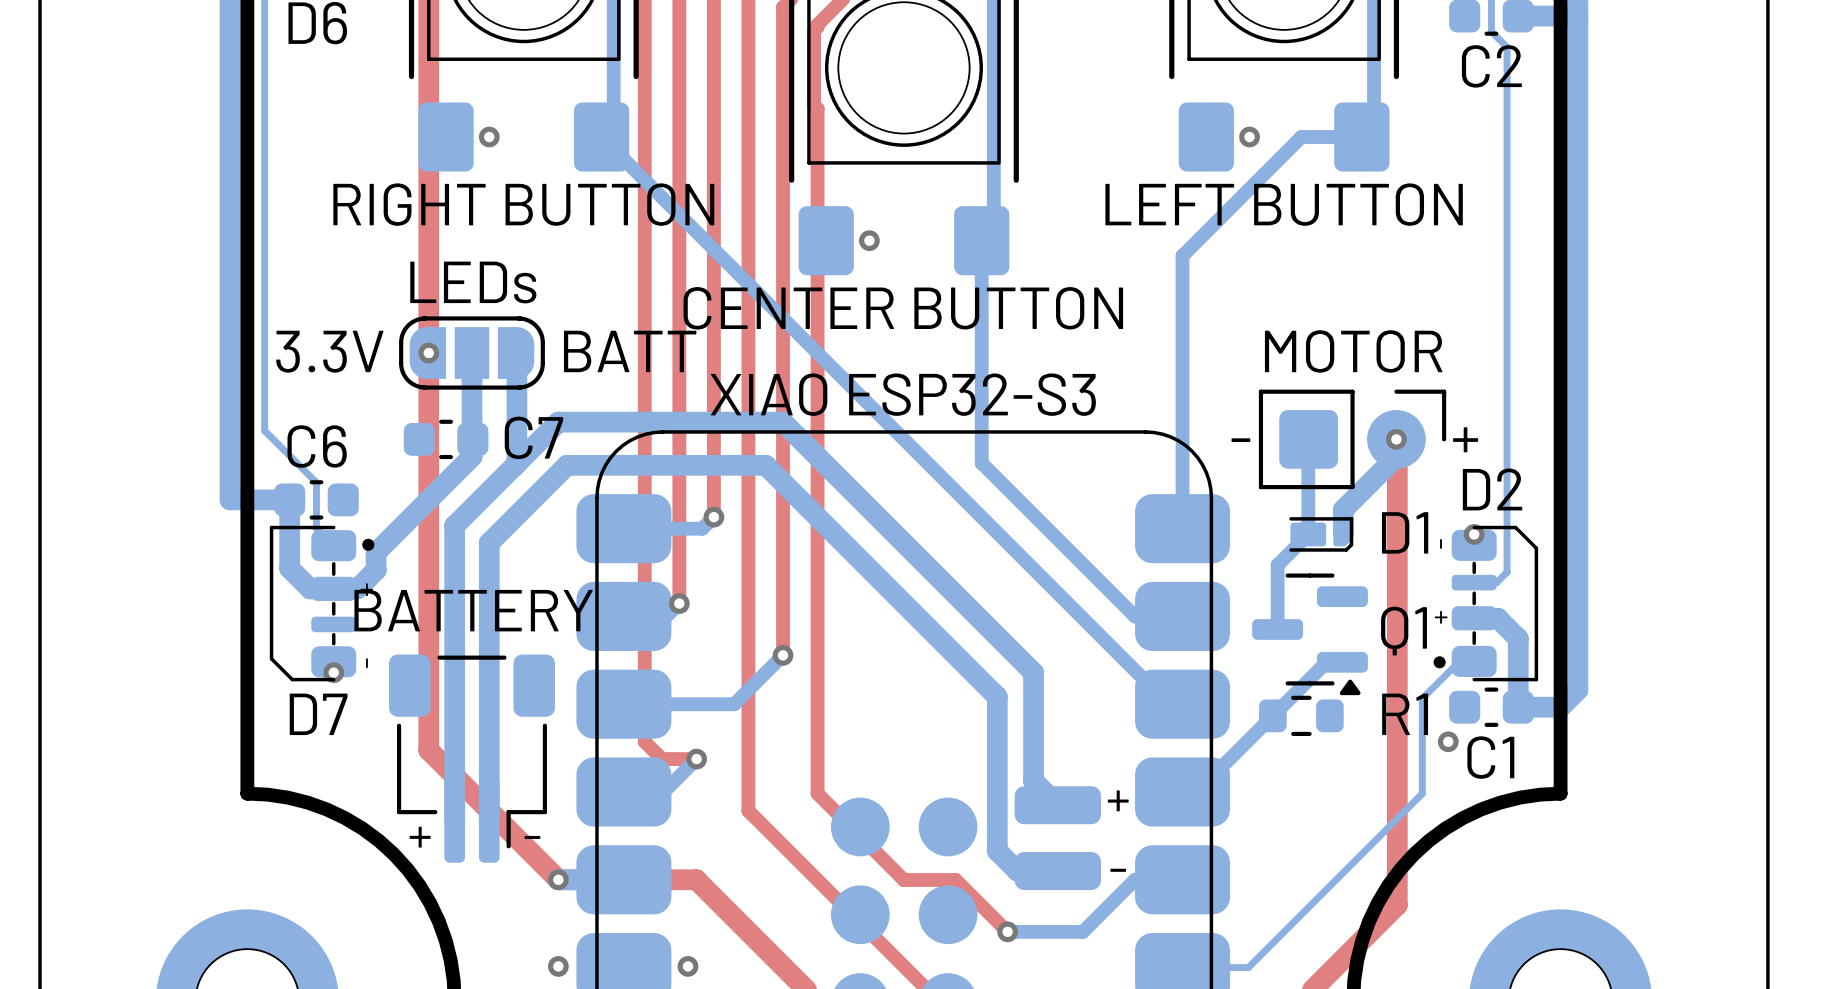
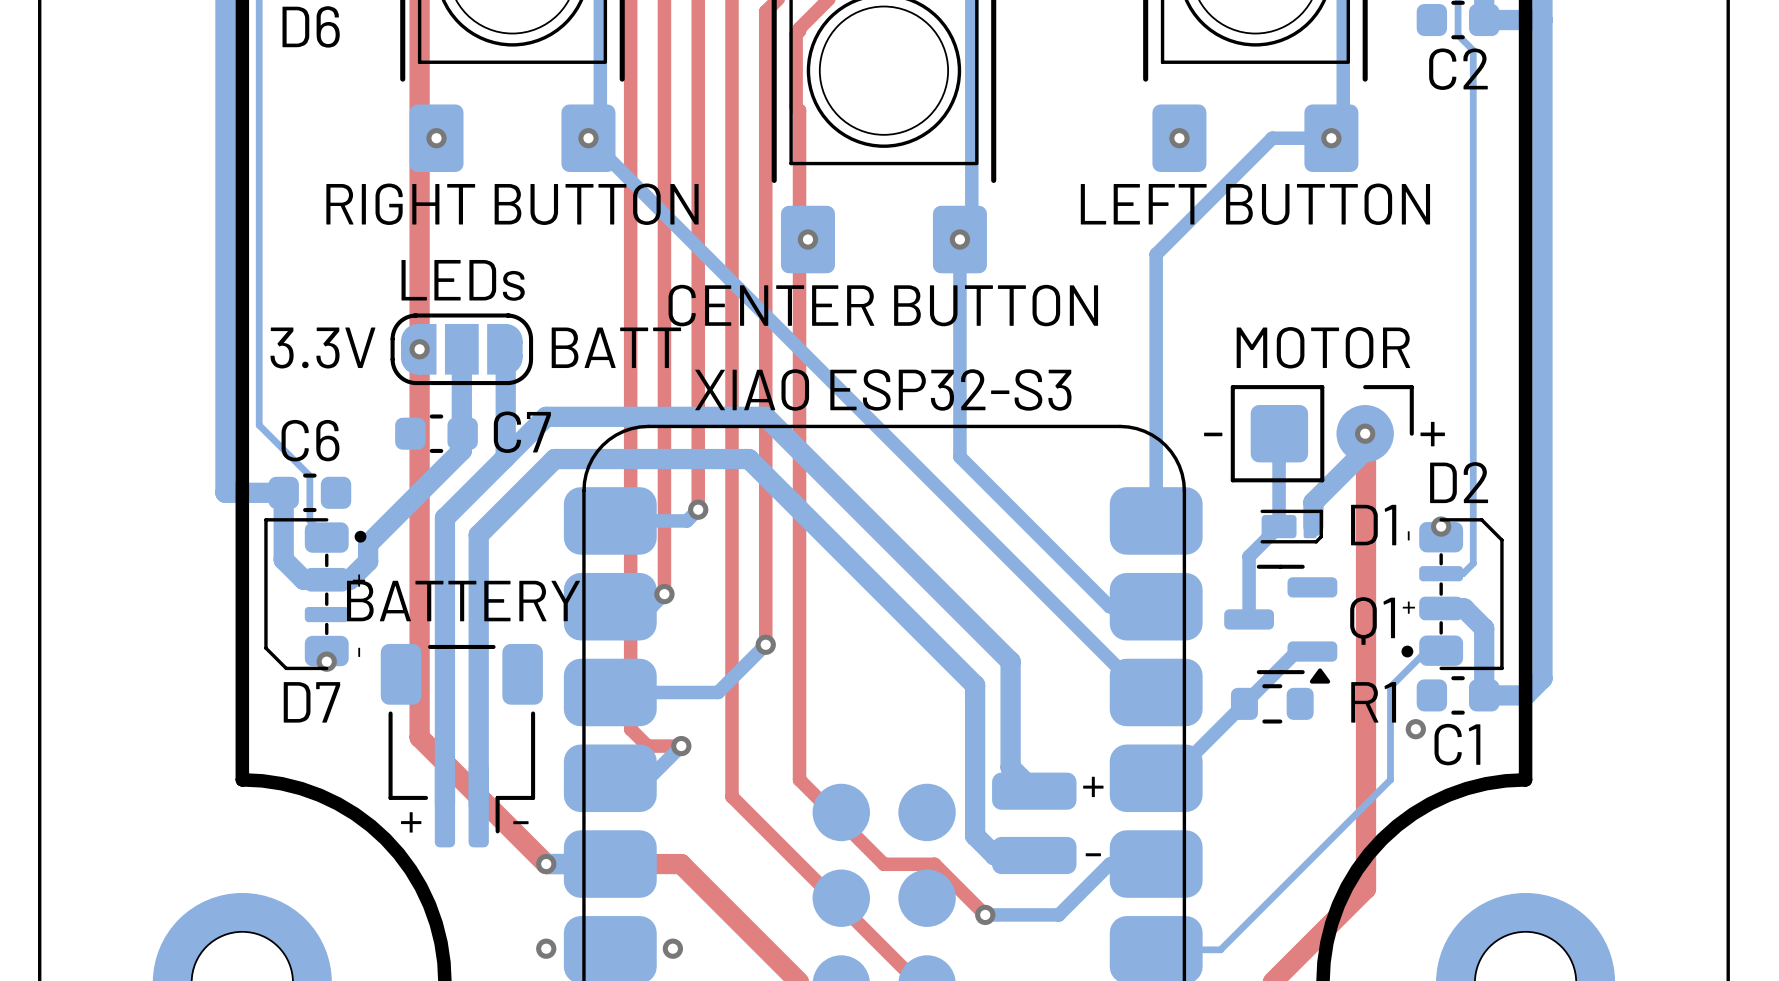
via position: (489, 137) -> (436, 138)
via: none -> (588, 138)
via position: (1249, 137) -> (1179, 138)
via: none -> (1331, 138)
via position: (869, 240) -> (807, 239)
via: none -> (959, 239)

